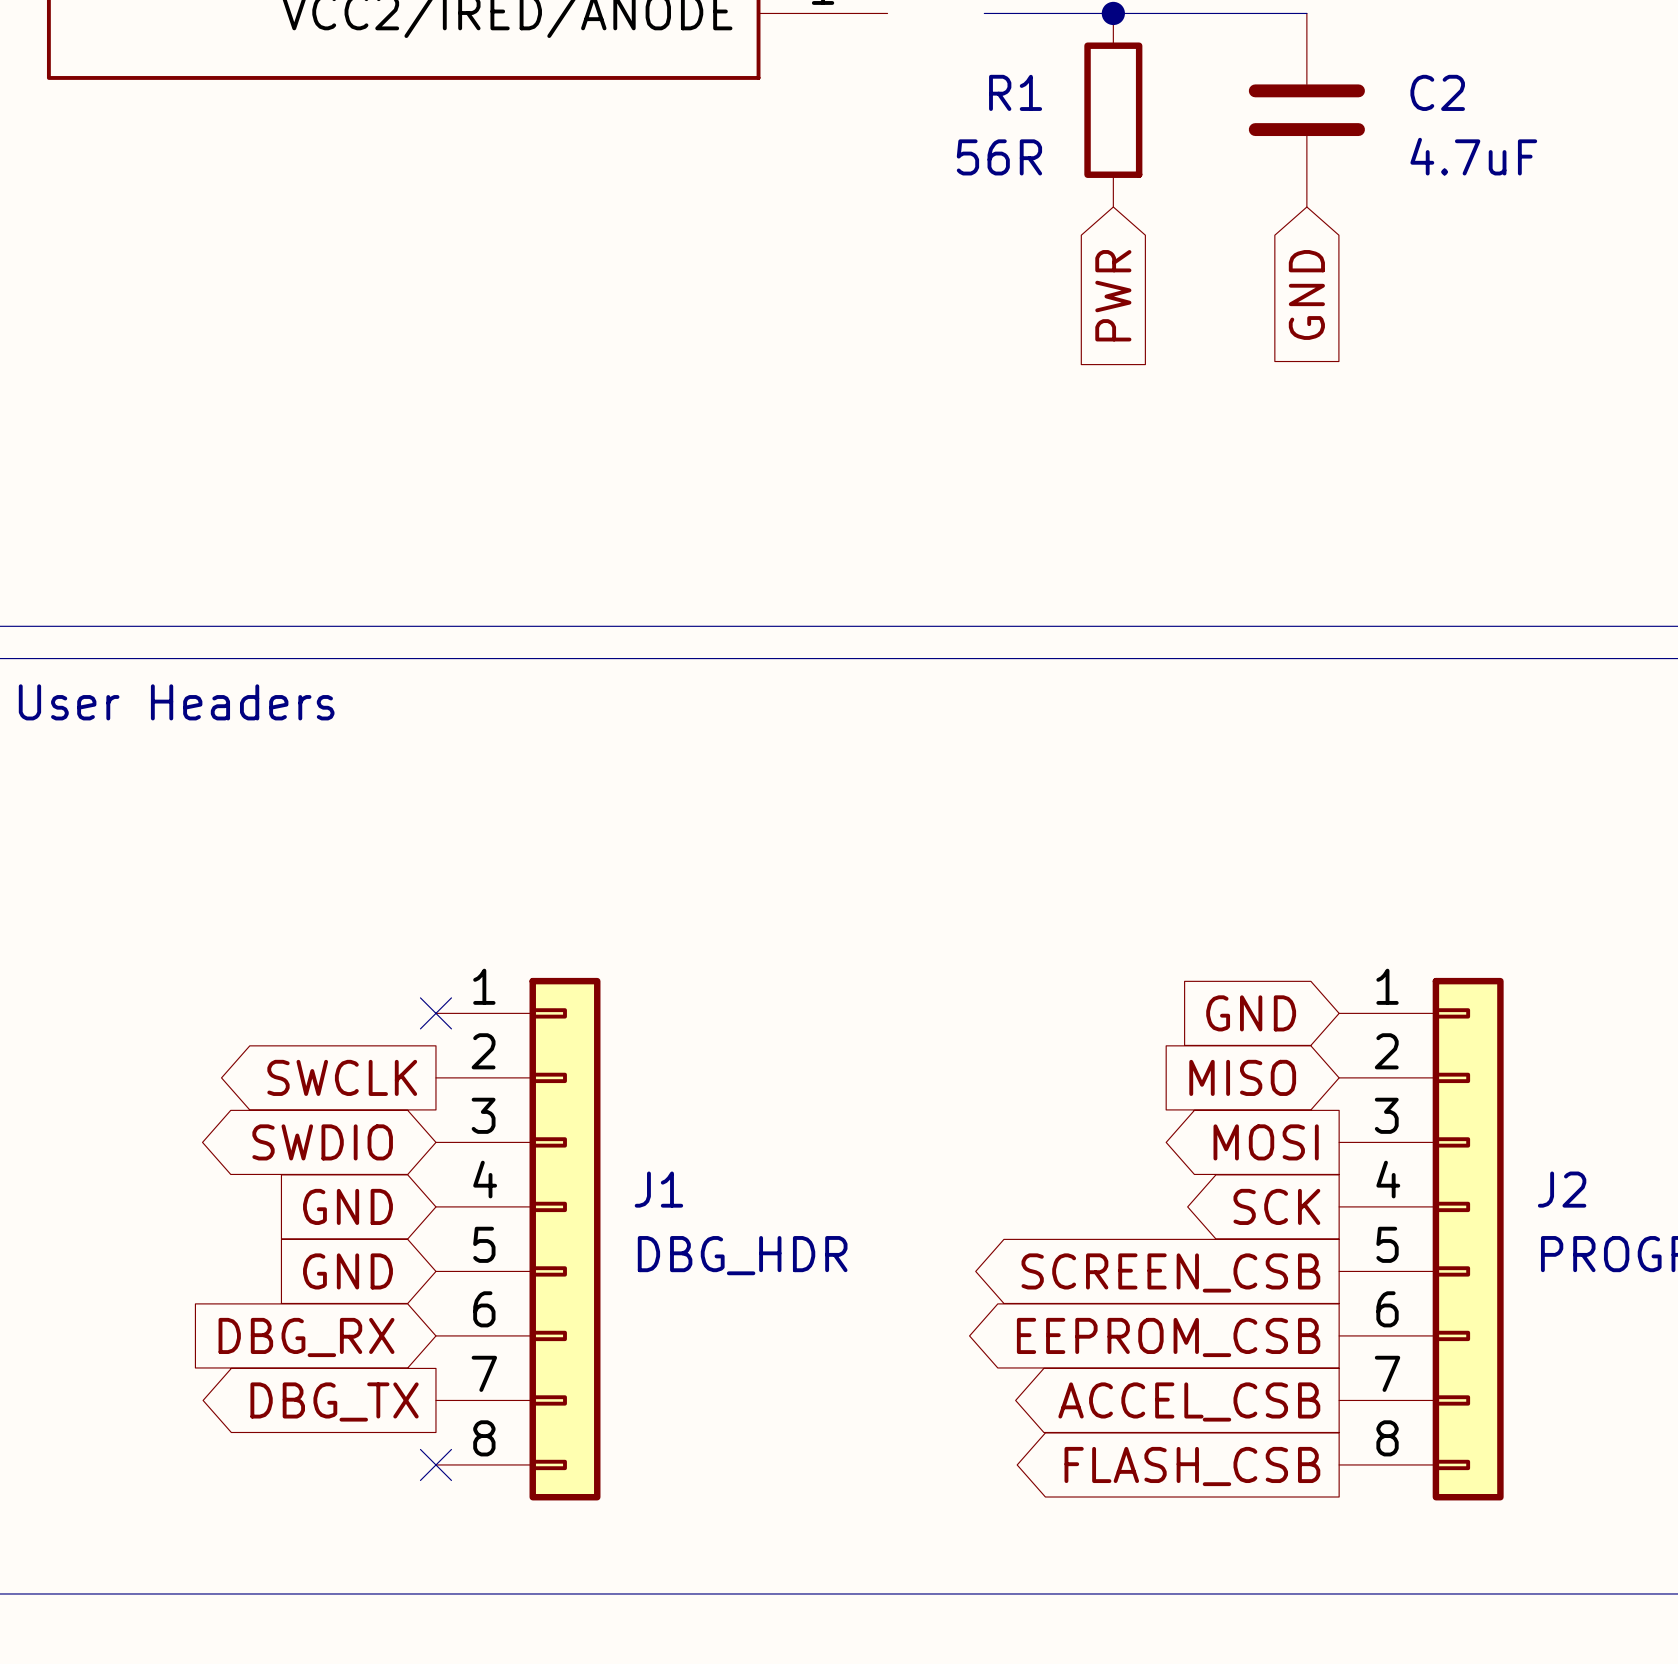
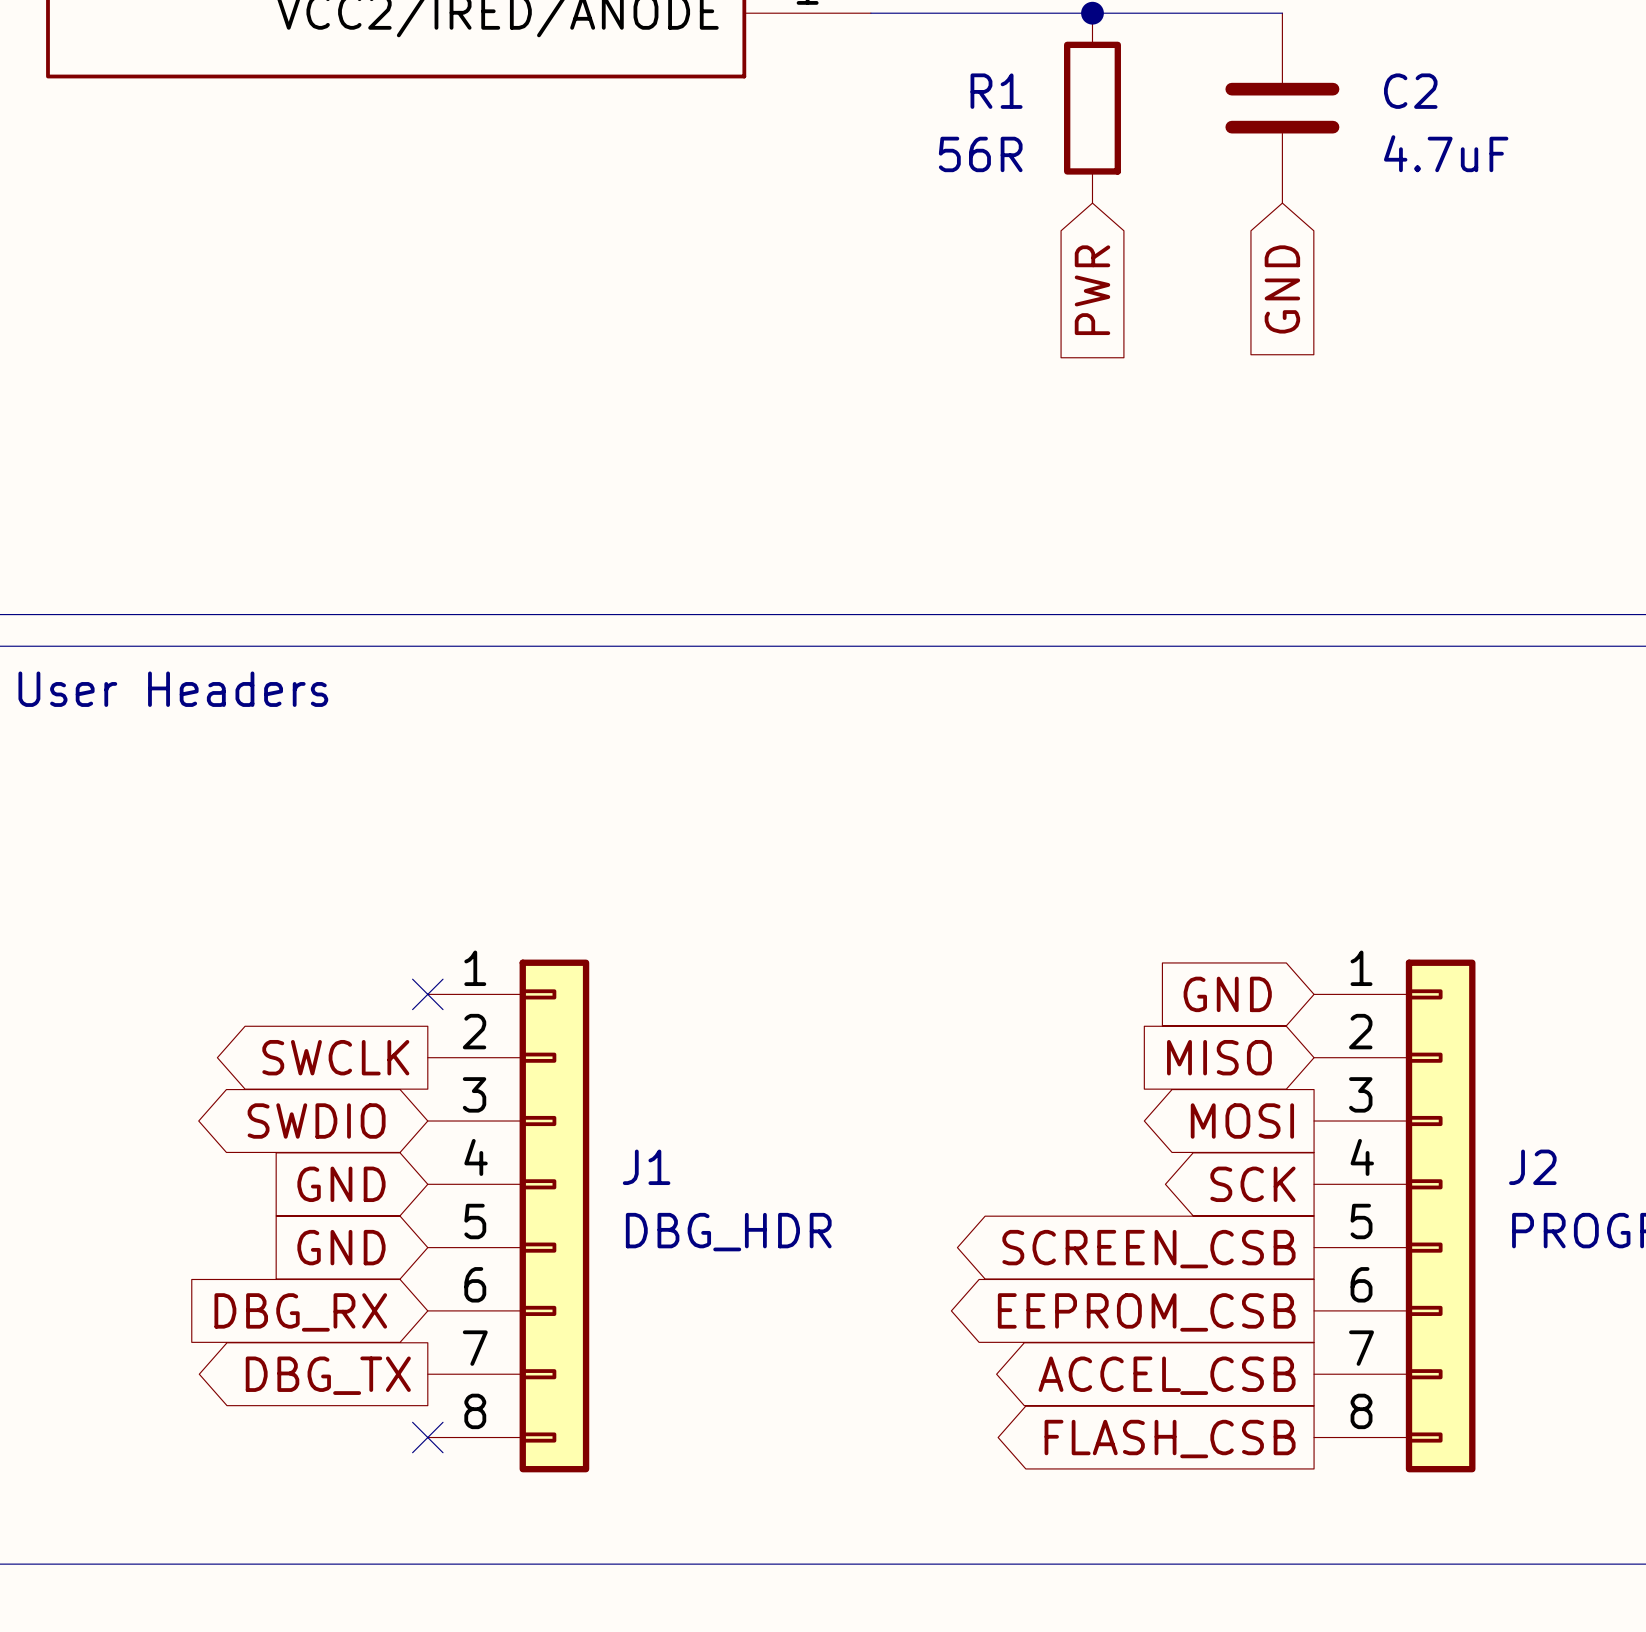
wire: none -> (870, 13) (965, 13)

